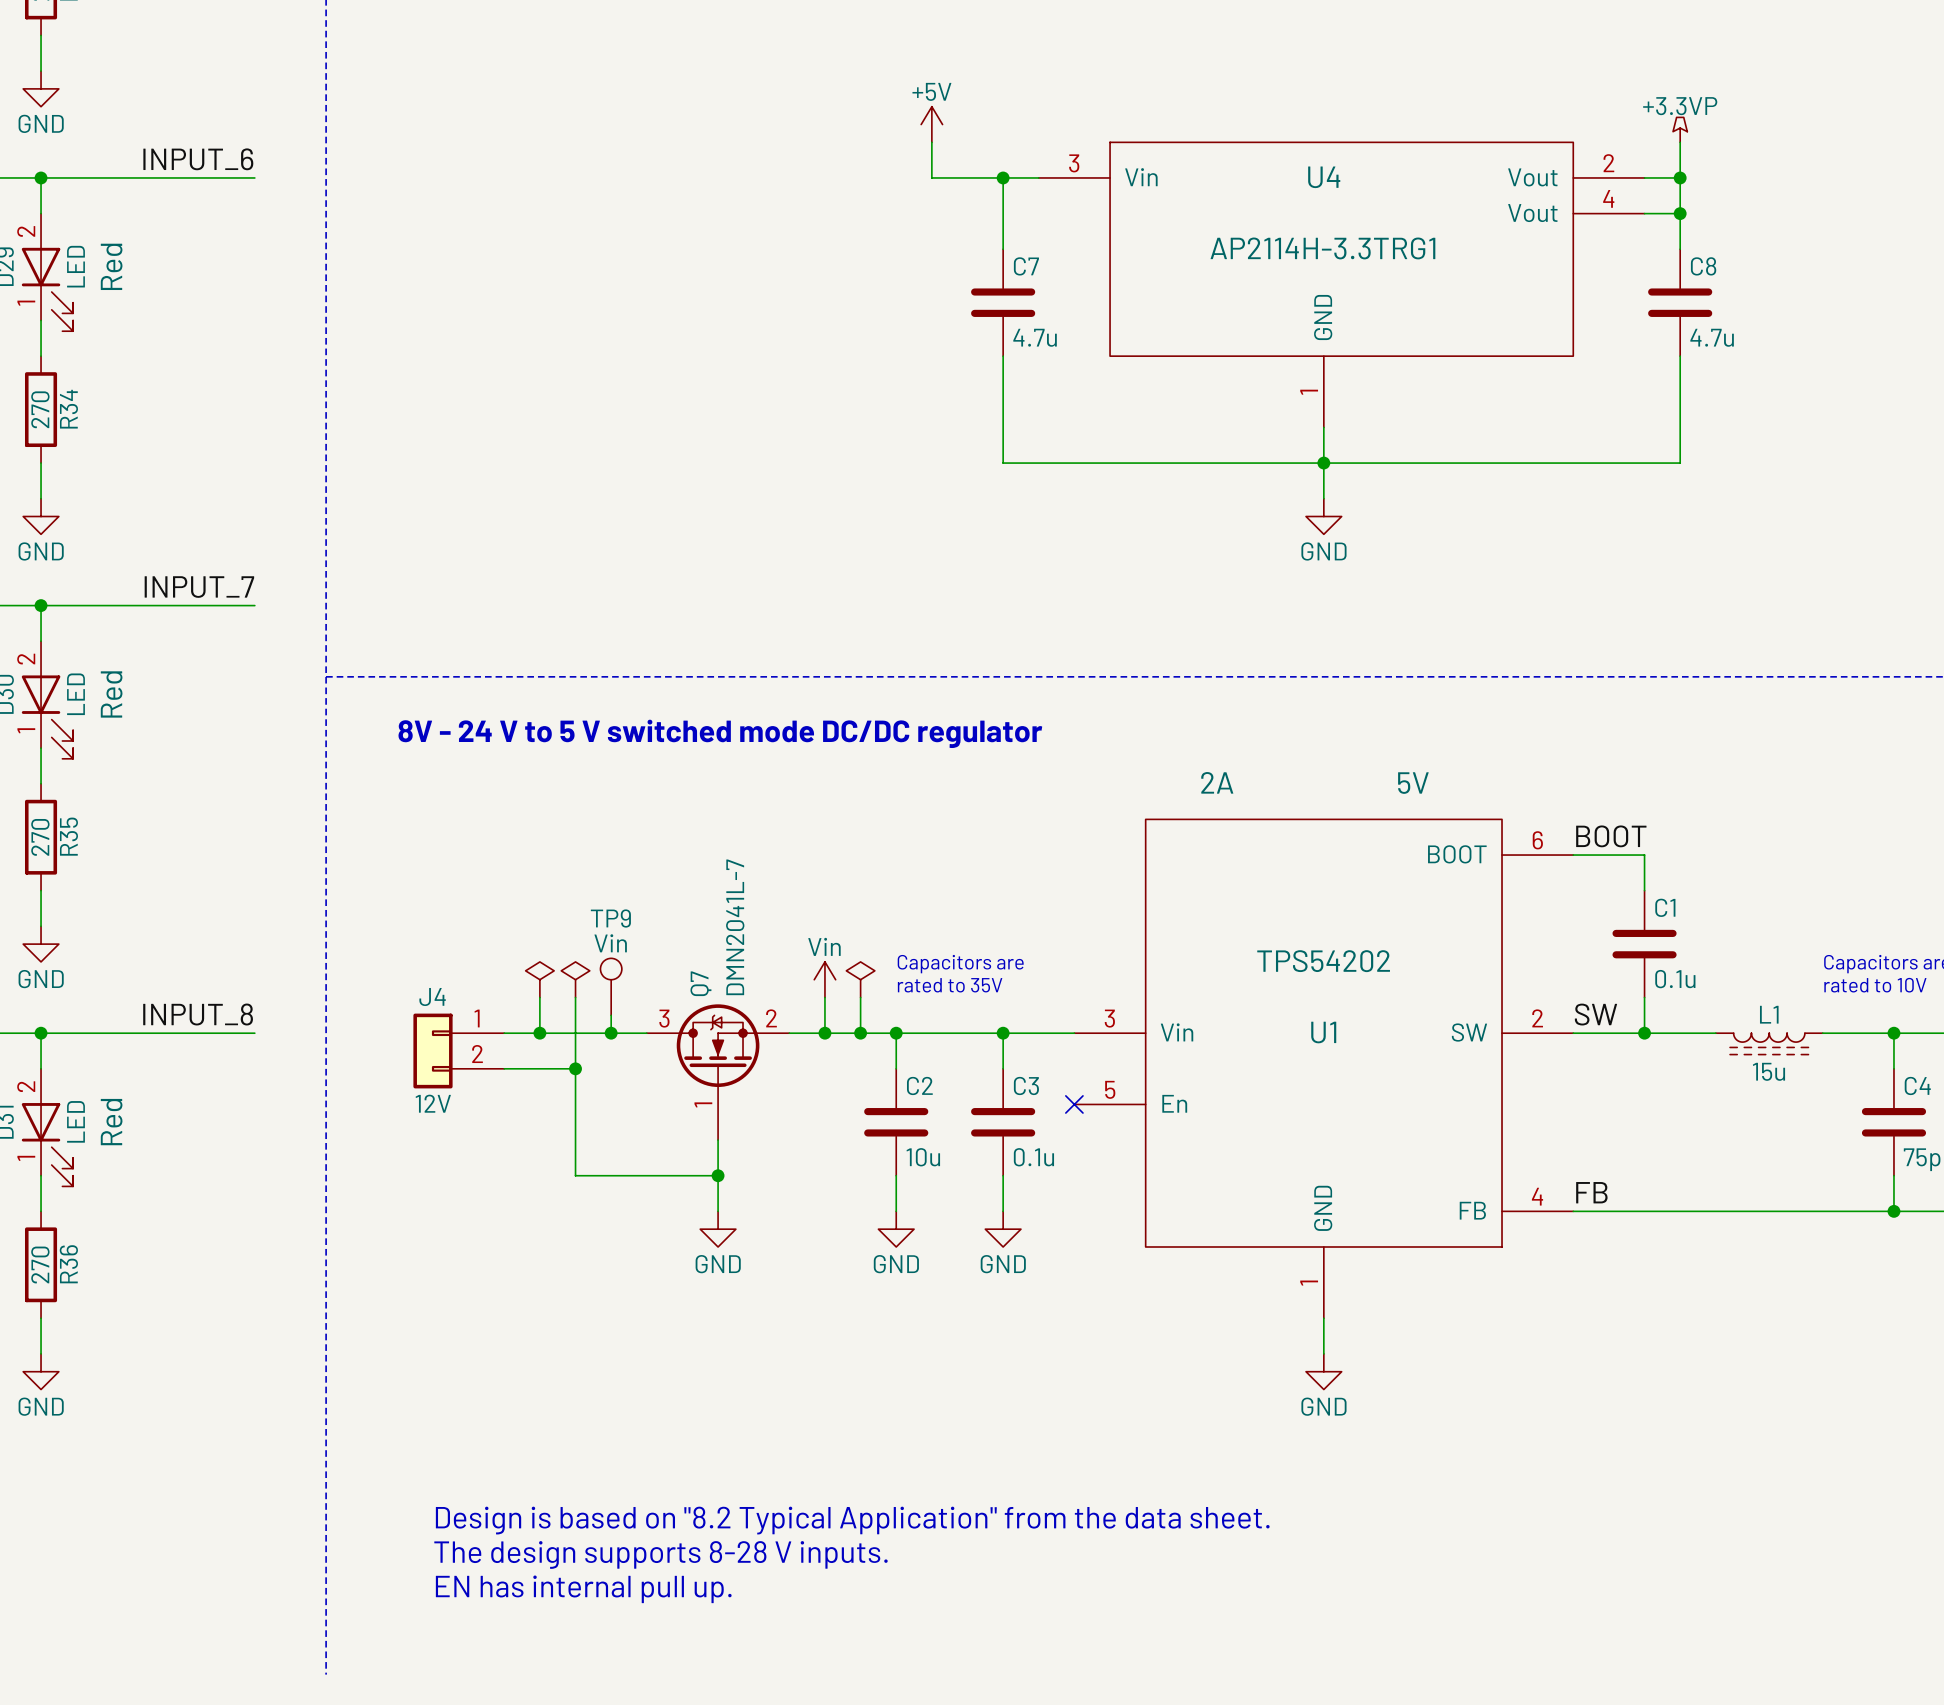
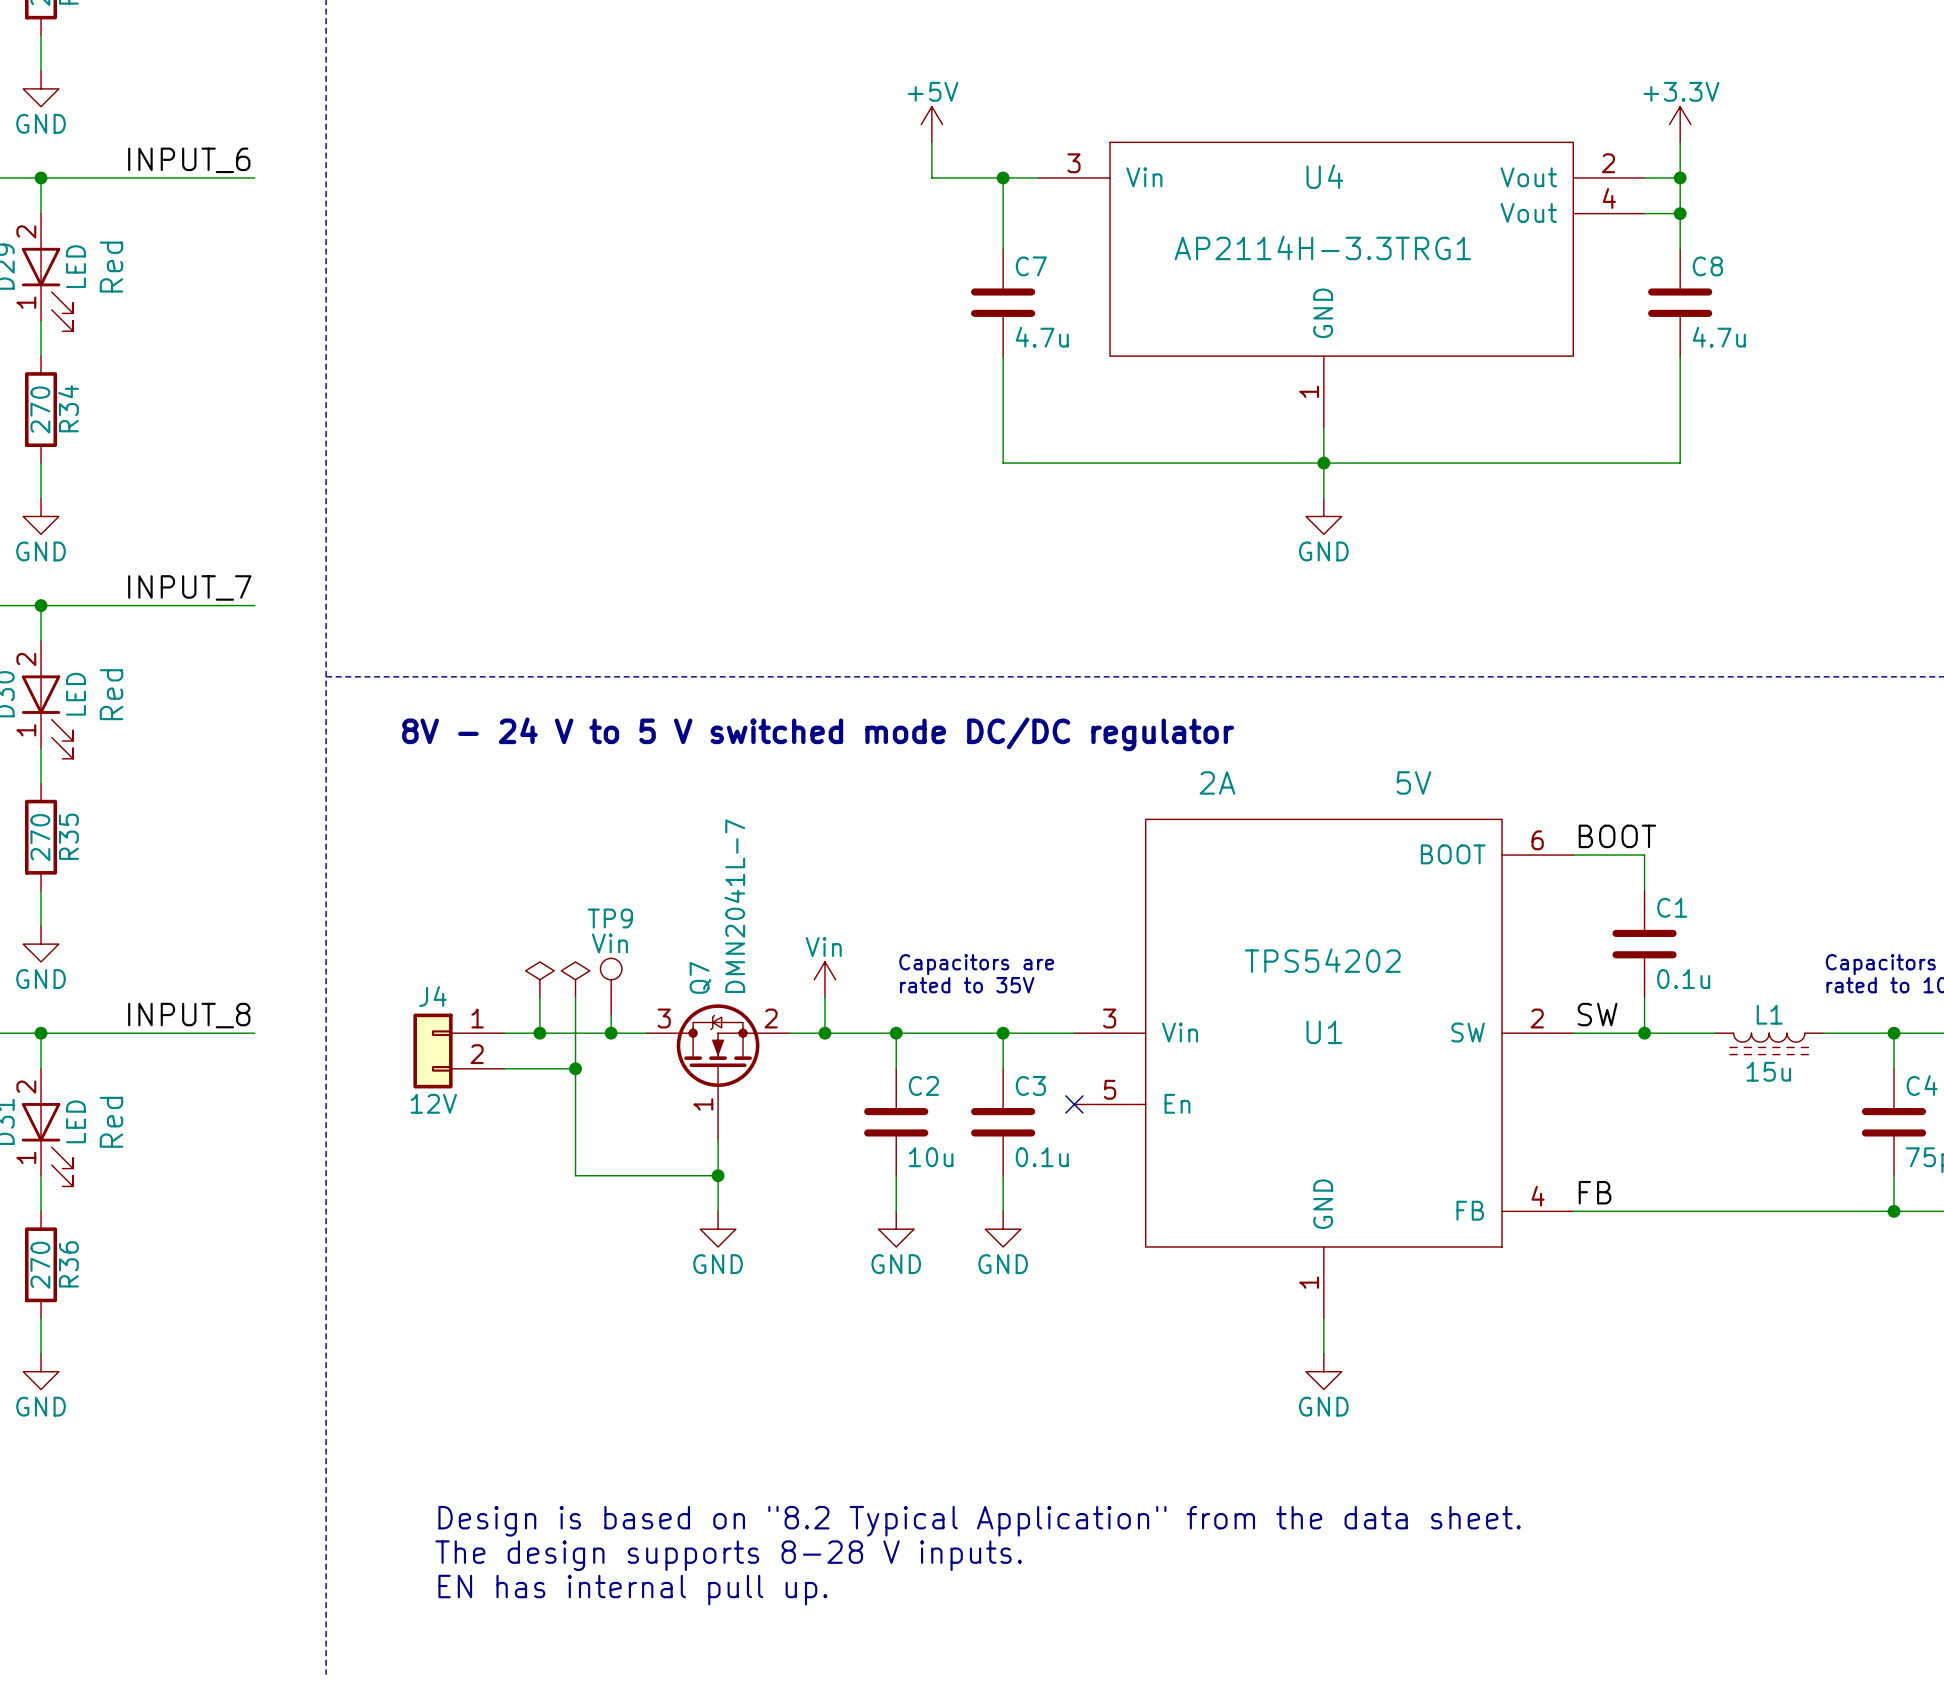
power symbol: +3.3VP (1680, 129) -> +3.3V (1680, 124)
power symbol: (860, 979) -> none
wire: (860, 997) (860, 1033) -> none
junction: (860, 1033) -> none

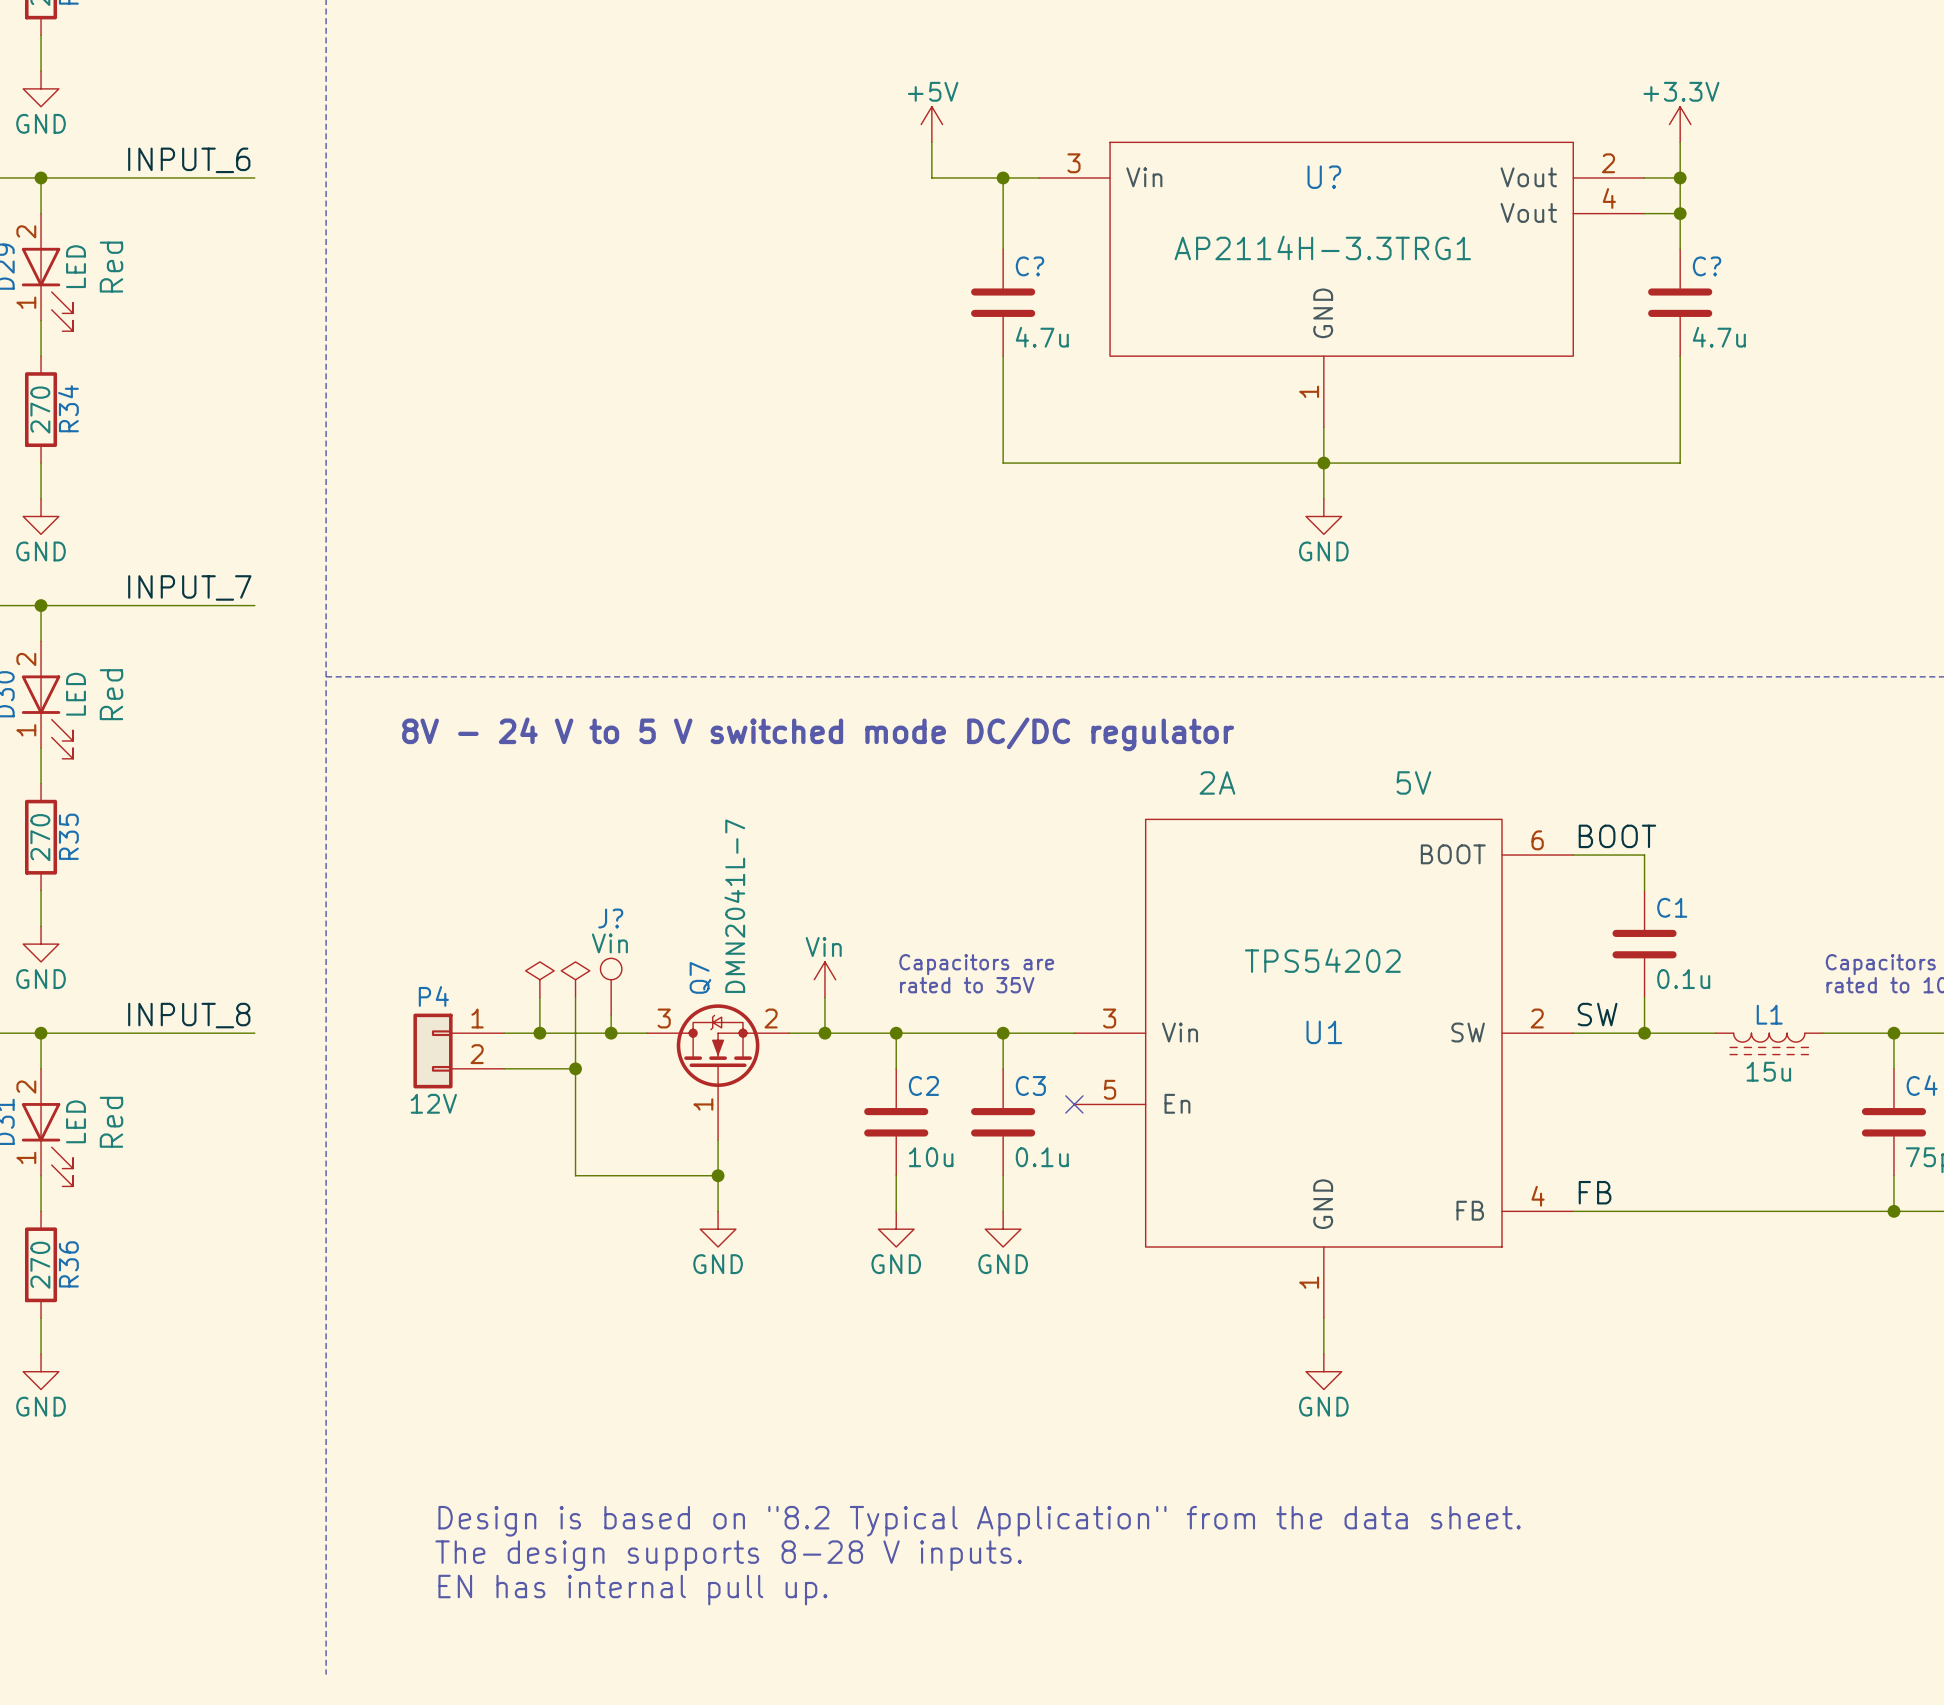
U4 name: U4 (1324, 176) -> U? (1324, 177)
C7 name: C7 (1031, 266) -> C? (1029, 266)
C8 name: C8 (1707, 266) -> C? (1707, 266)
TP9 name: TP9 (610, 918) -> J? (610, 918)
J4 name: J4 (432, 996) -> P4 (433, 996)

